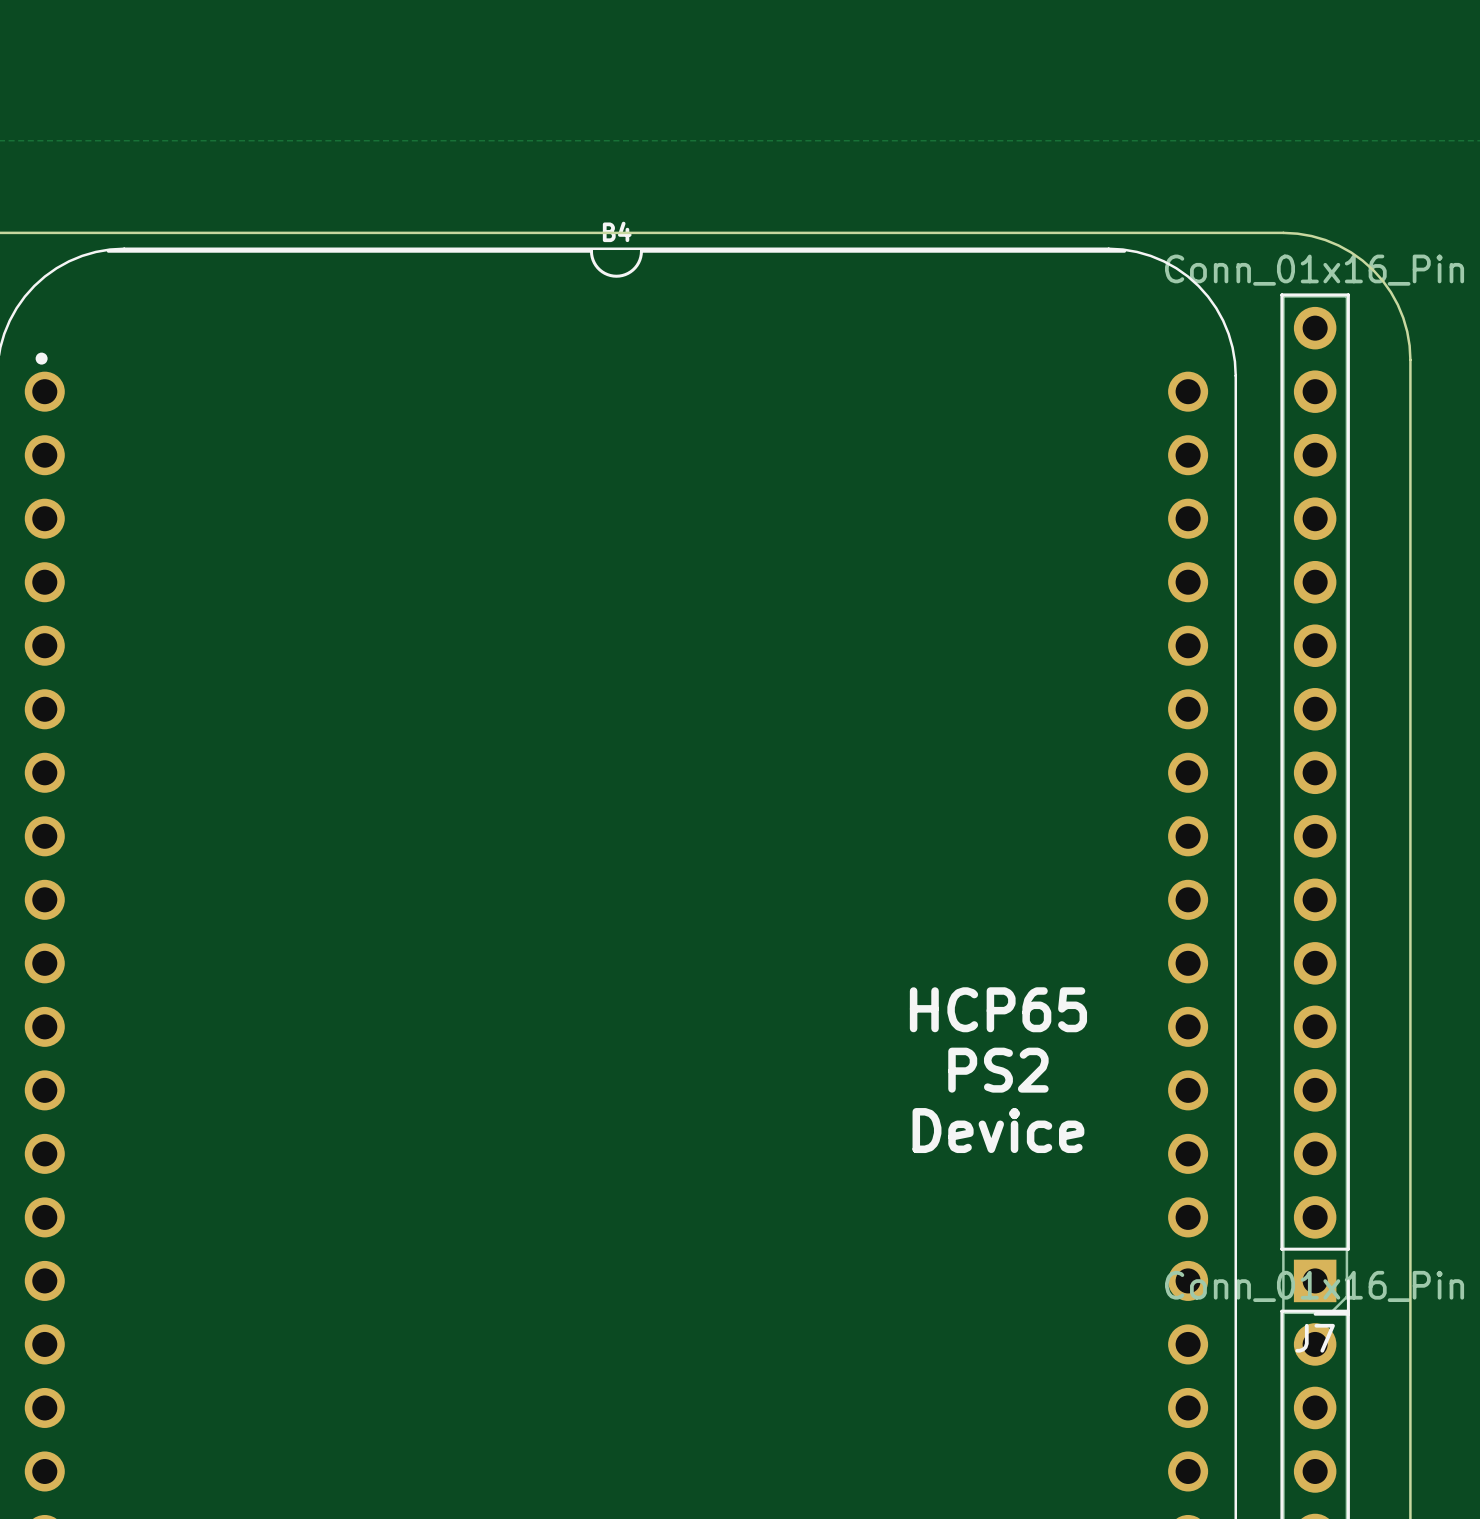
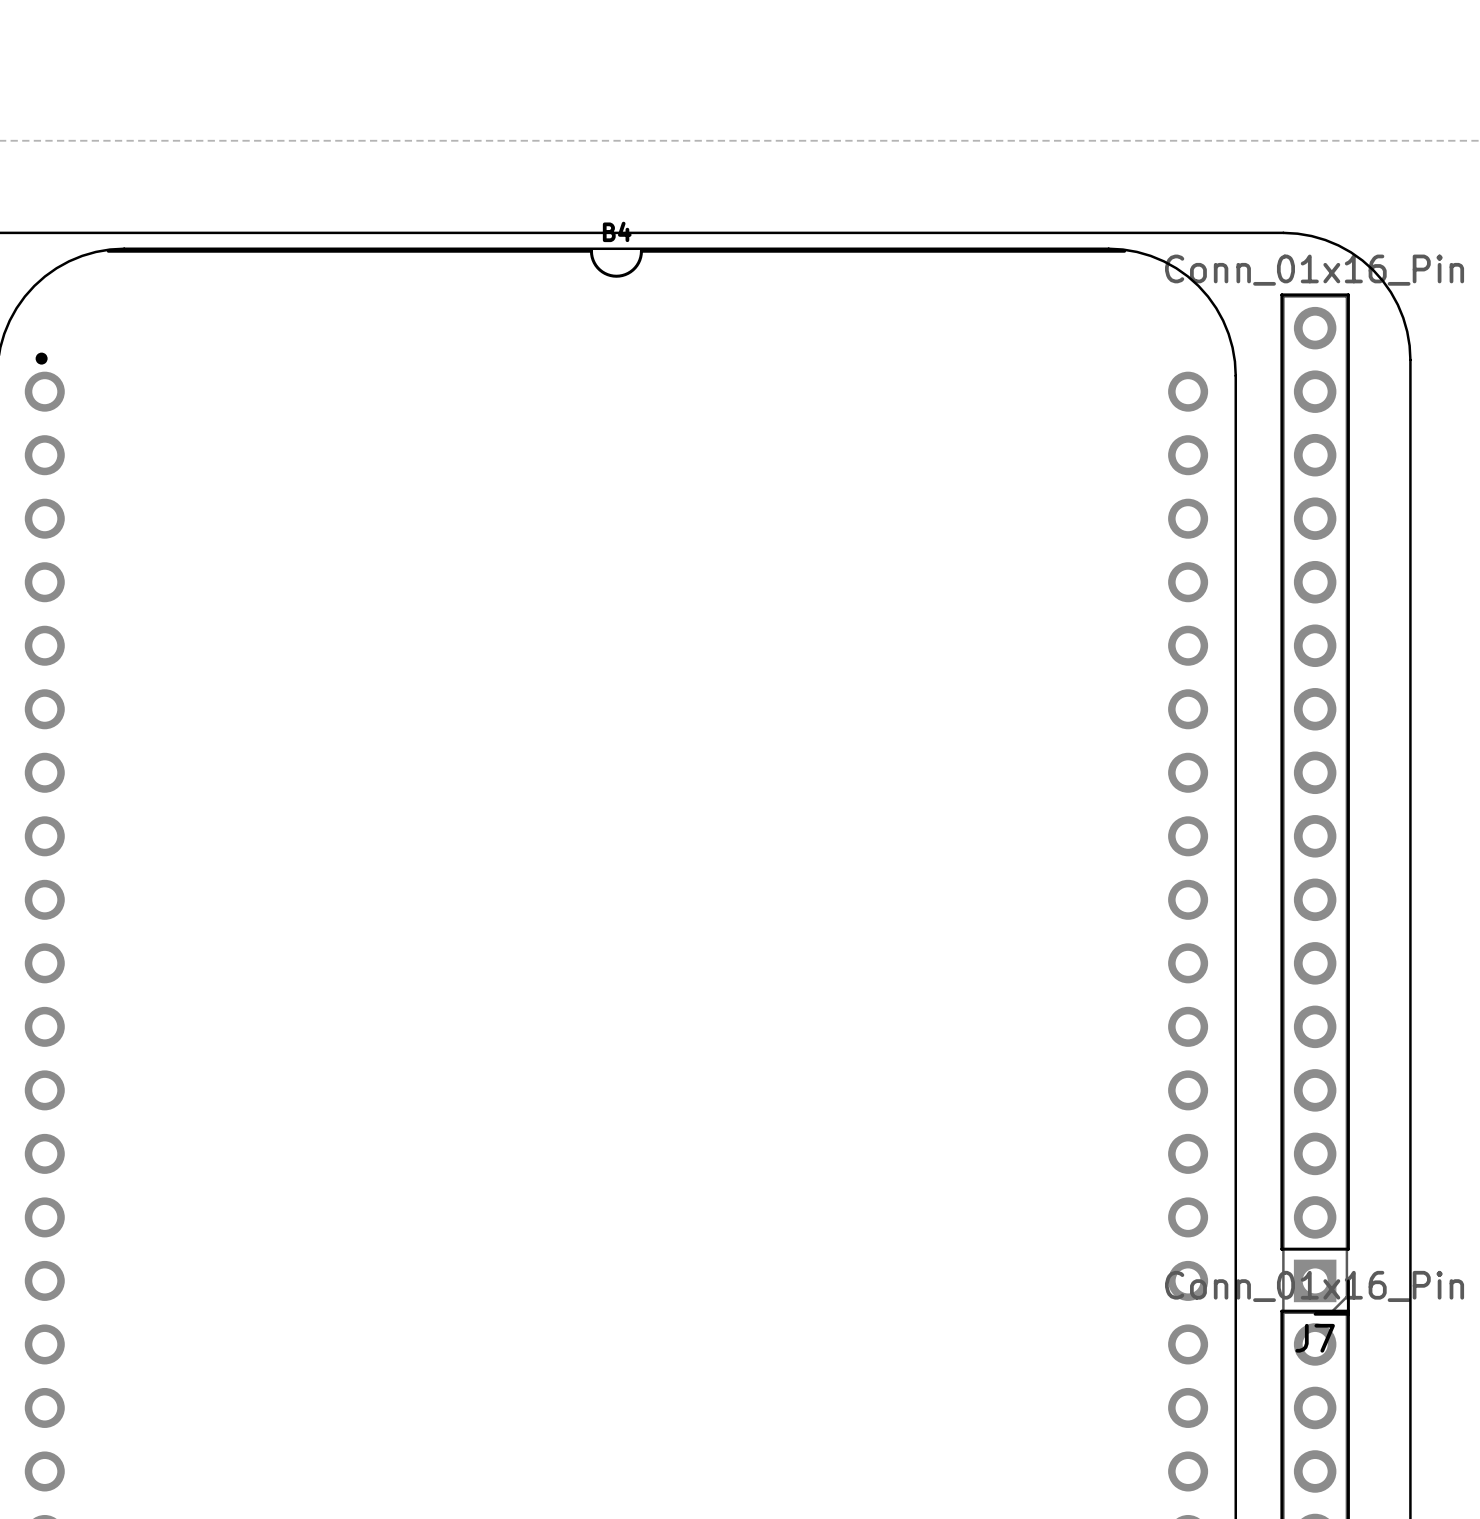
text: HCP65 (998, 1009) -> none
text: PS2 (998, 1070) -> none
text: Device (998, 1130) -> none

